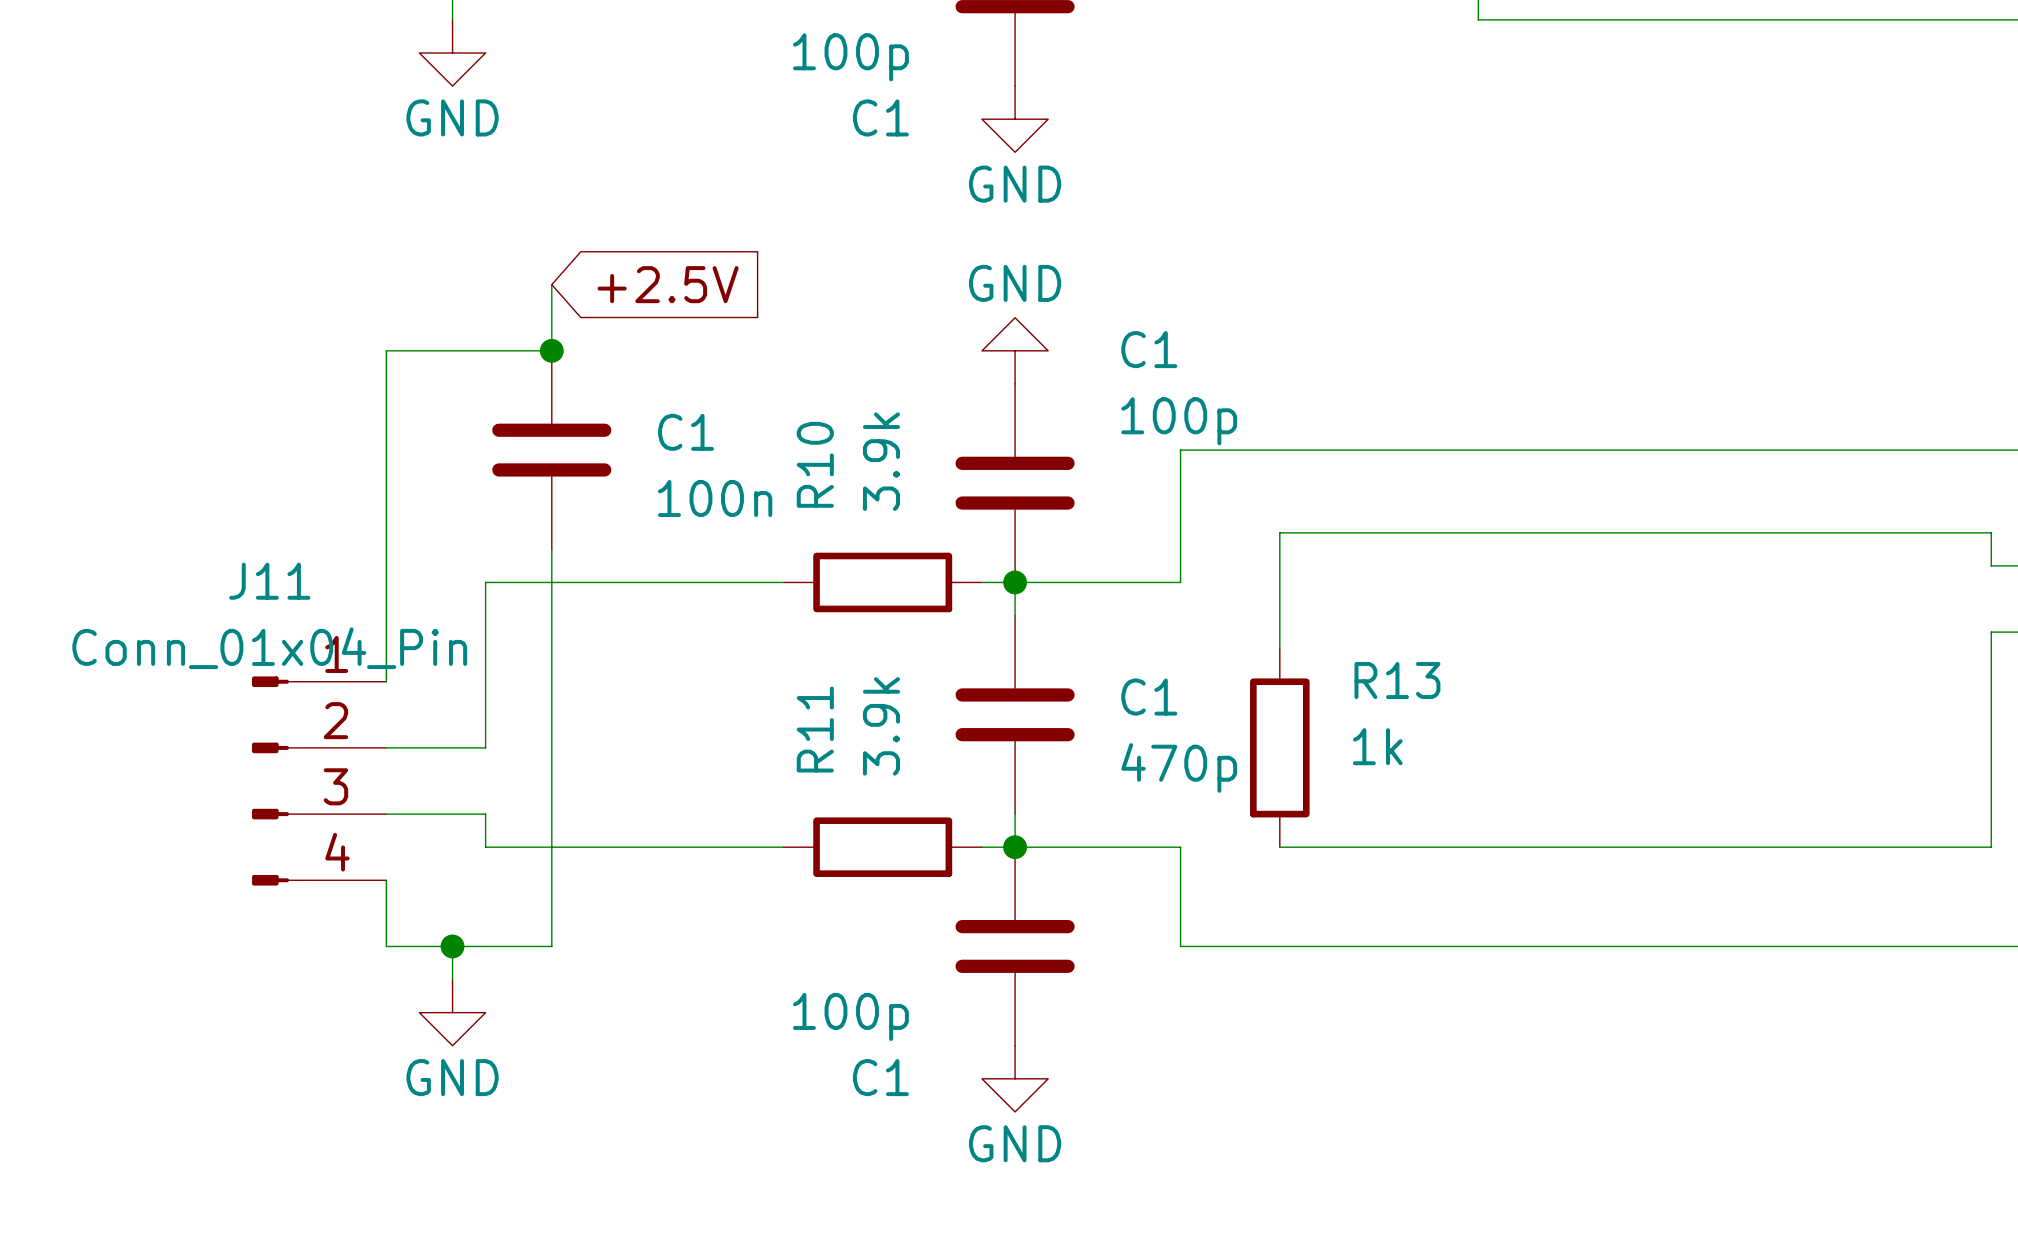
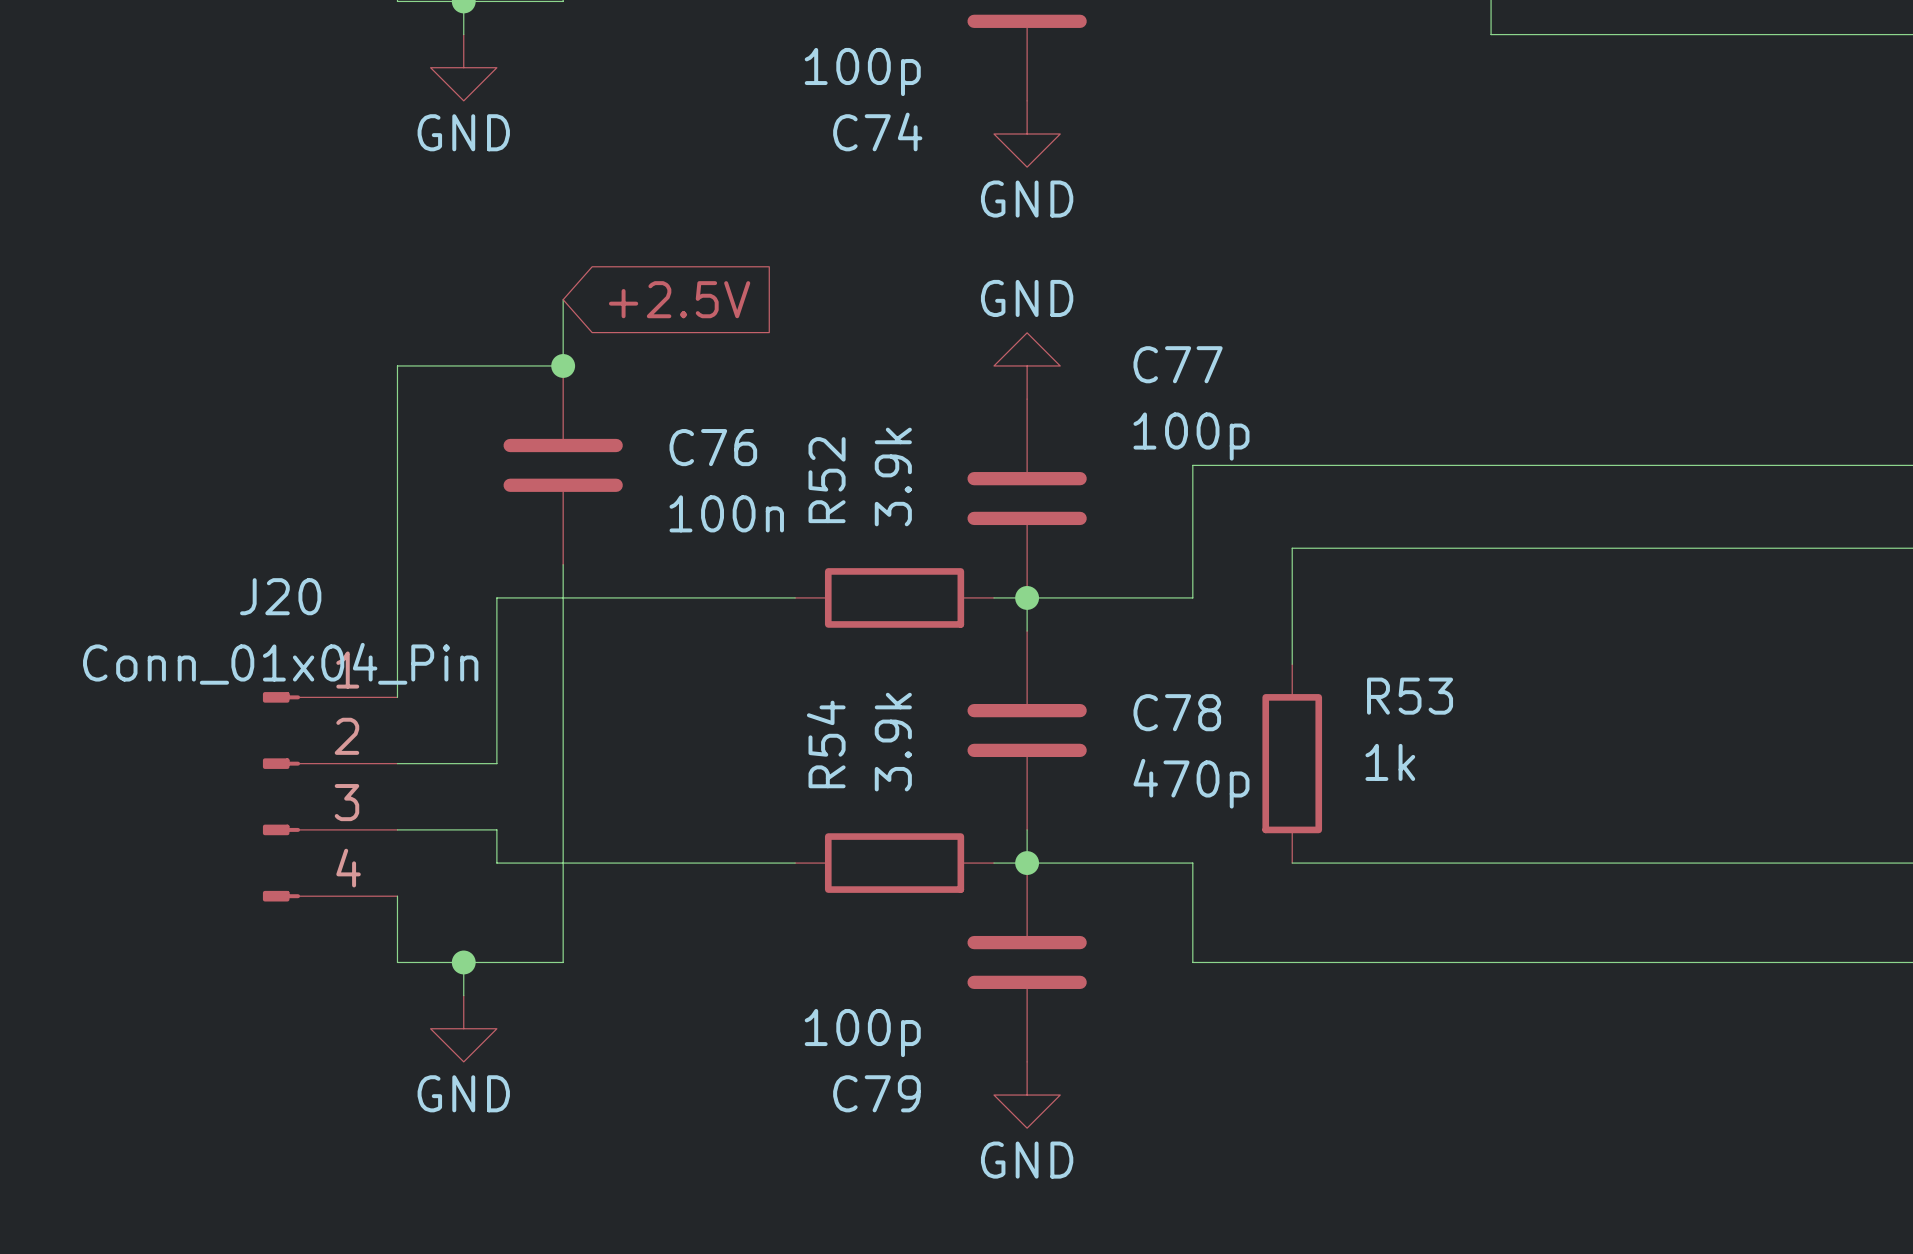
C1 name: C1 (880, 117) -> C74 (877, 131)
C1 name: C1 (1149, 349) -> C77 (1178, 364)
C1 name: C1 (685, 432) -> C76 (713, 447)
R10 name: R10 (815, 464) -> R52 (827, 480)
J11 name: J11 (269, 581) -> J20 (280, 596)
R13 name: R13 (1397, 680) -> R53 (1410, 696)
C1 name: C1 (1149, 697) -> C78 (1177, 712)
R11 name: R11 (815, 729) -> R54 (826, 744)
C1 name: C1 (880, 1077) -> C79 (876, 1093)

